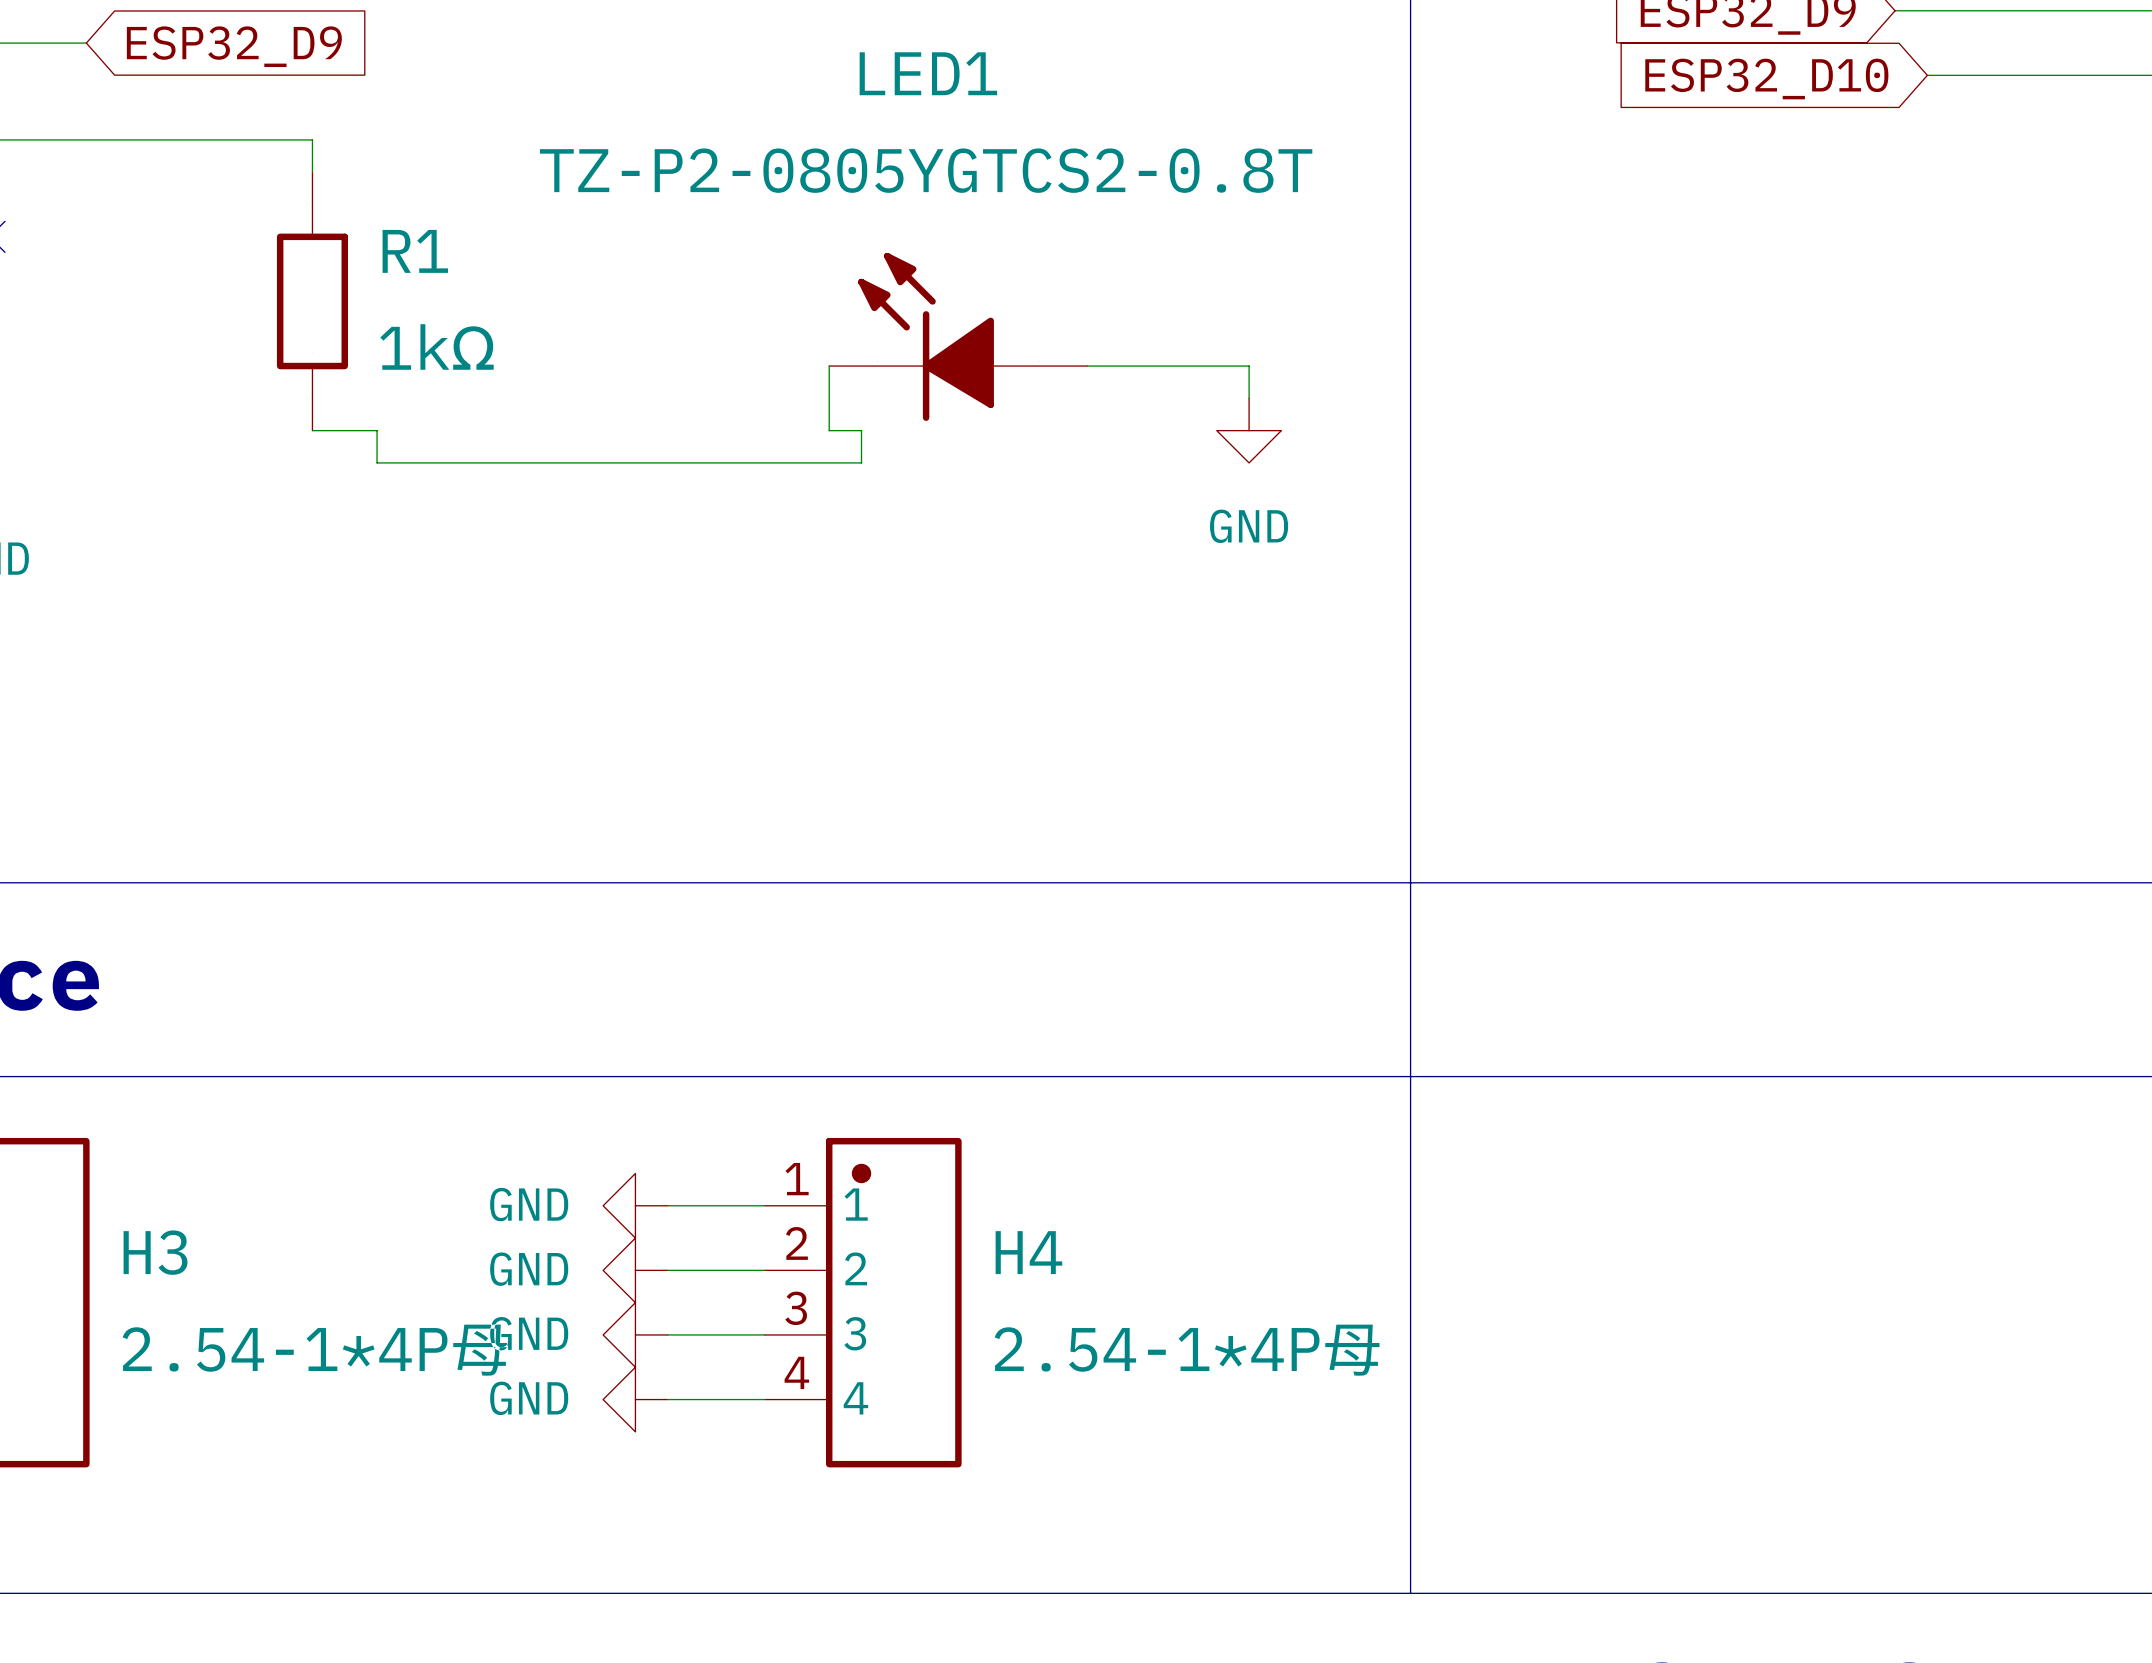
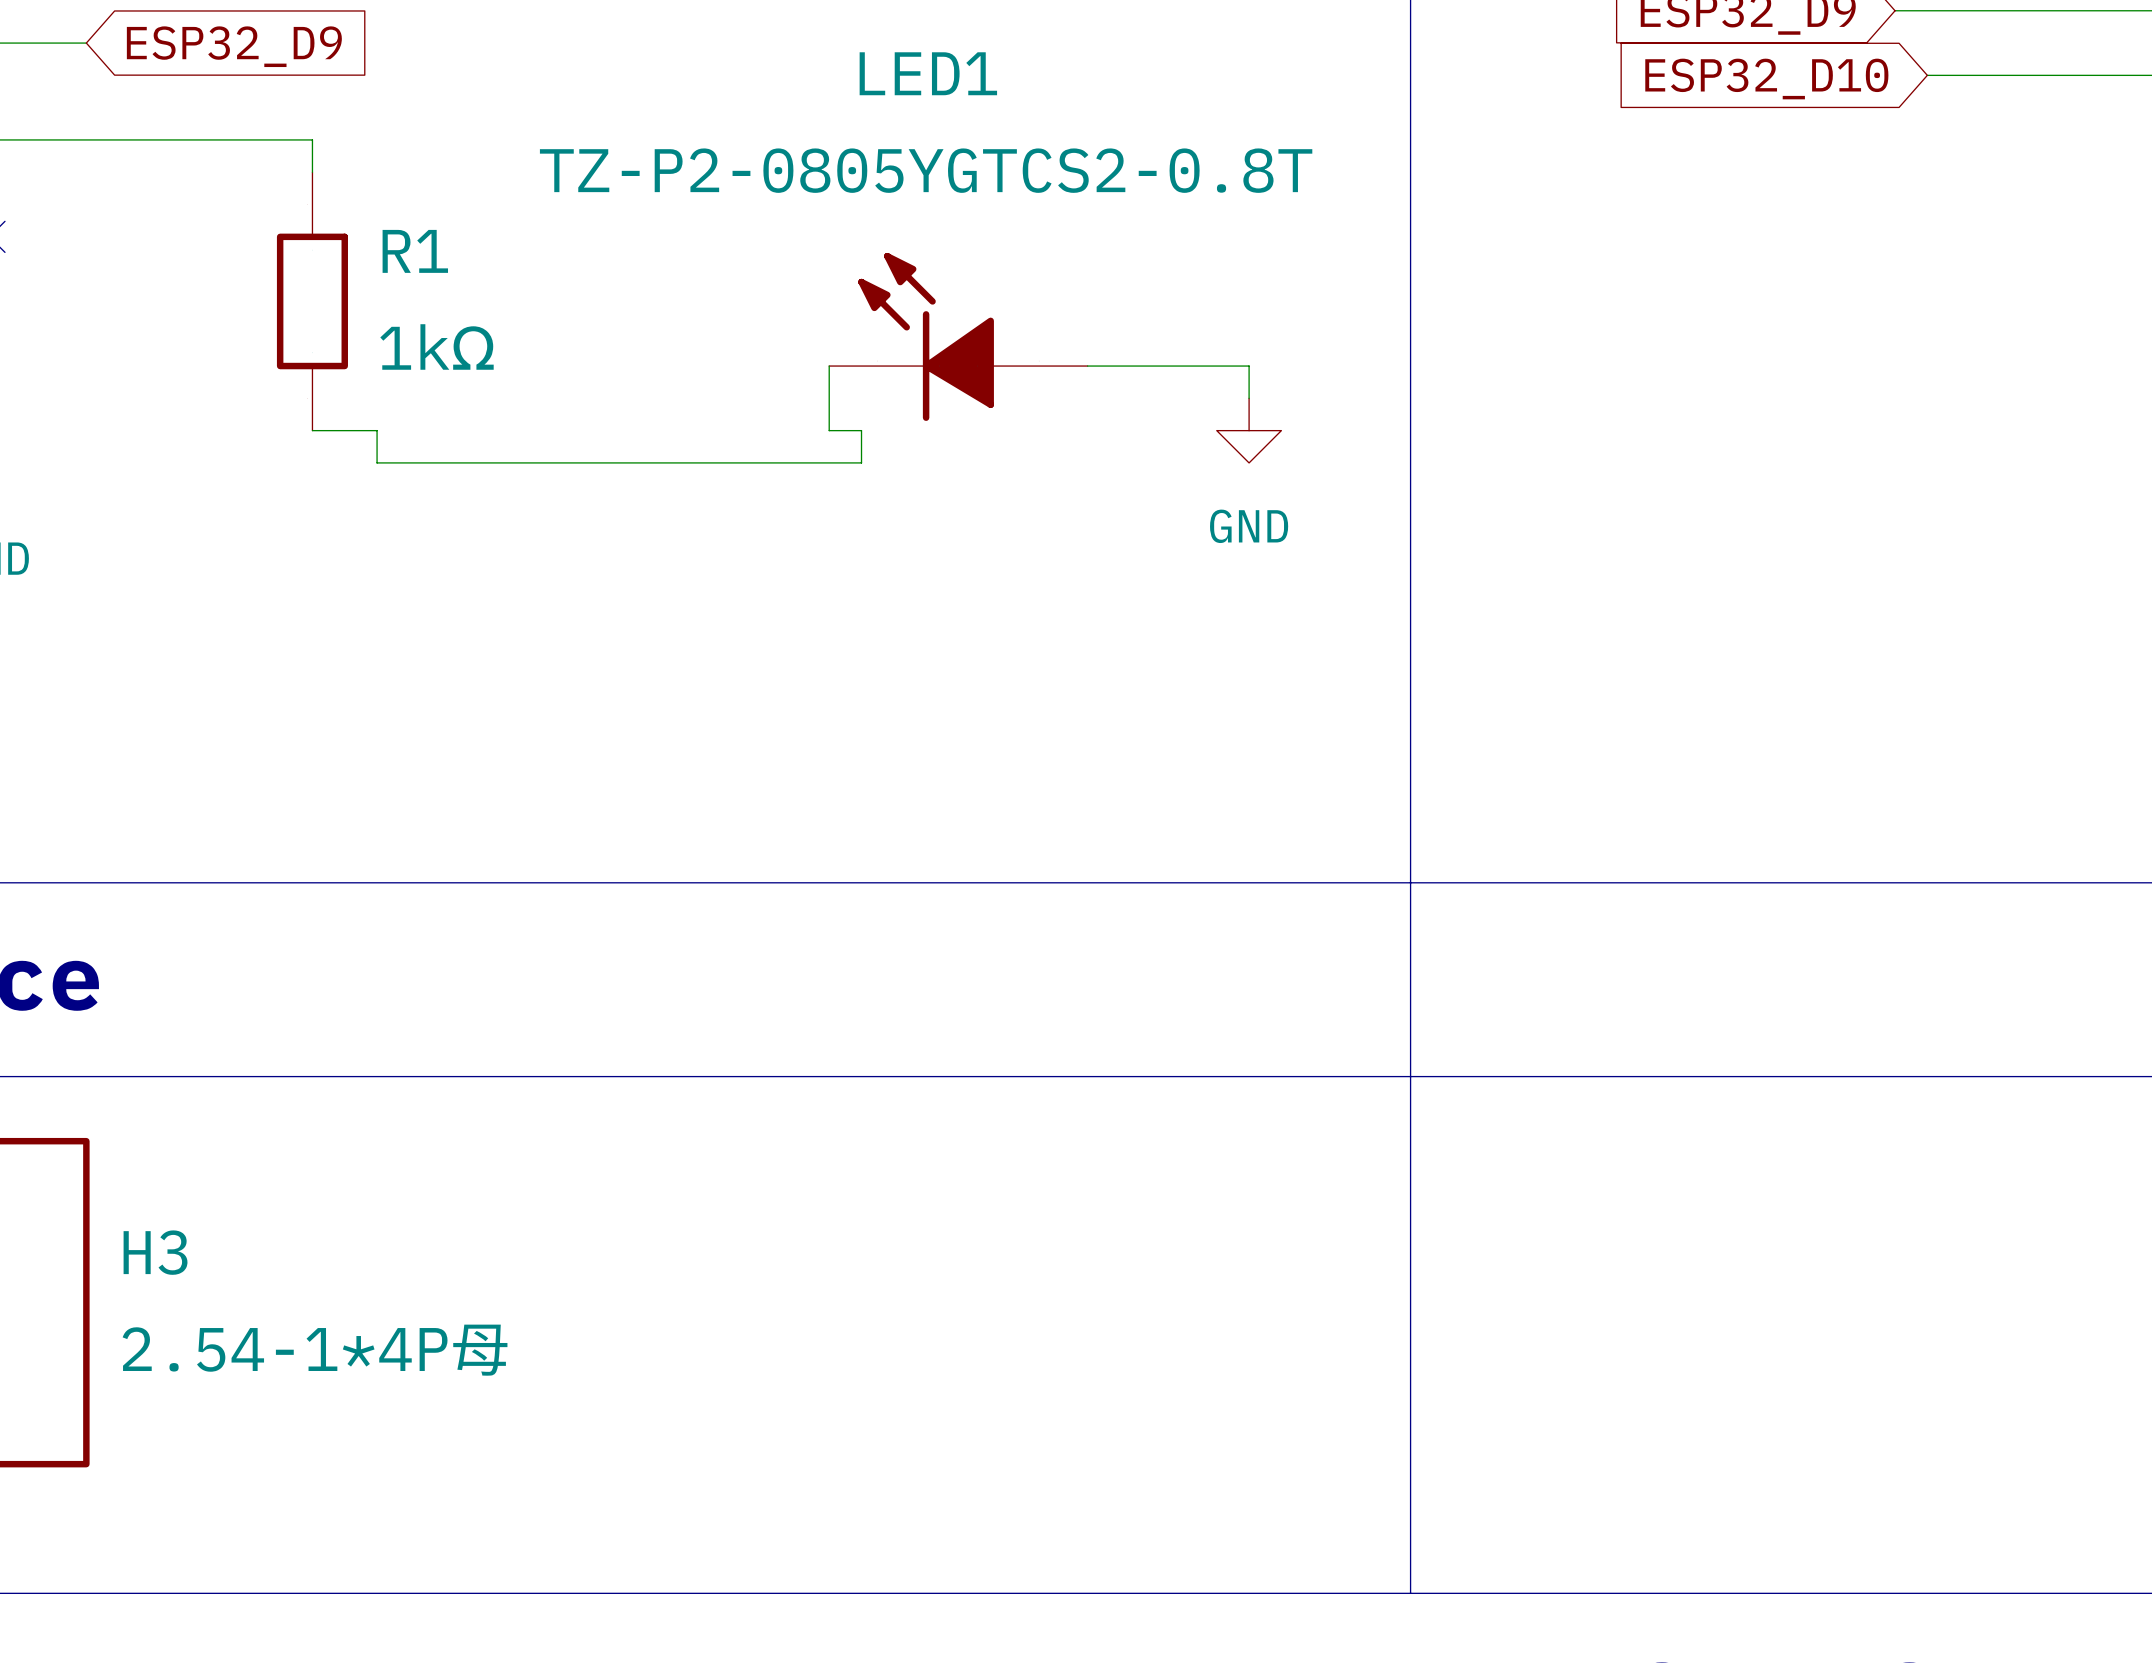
power symbol: GND (635, 1205) -> none
wire: (667, 1205) (764, 1205) -> none
power symbol: GND (635, 1270) -> none
wire: (667, 1270) (764, 1270) -> none
H4: 2.54-1*4P母 (863, 1302) -> none
power symbol: GND (635, 1334) -> none
wire: (667, 1334) (764, 1334) -> none
power symbol: GND (635, 1399) -> none
wire: (667, 1399) (764, 1399) -> none

